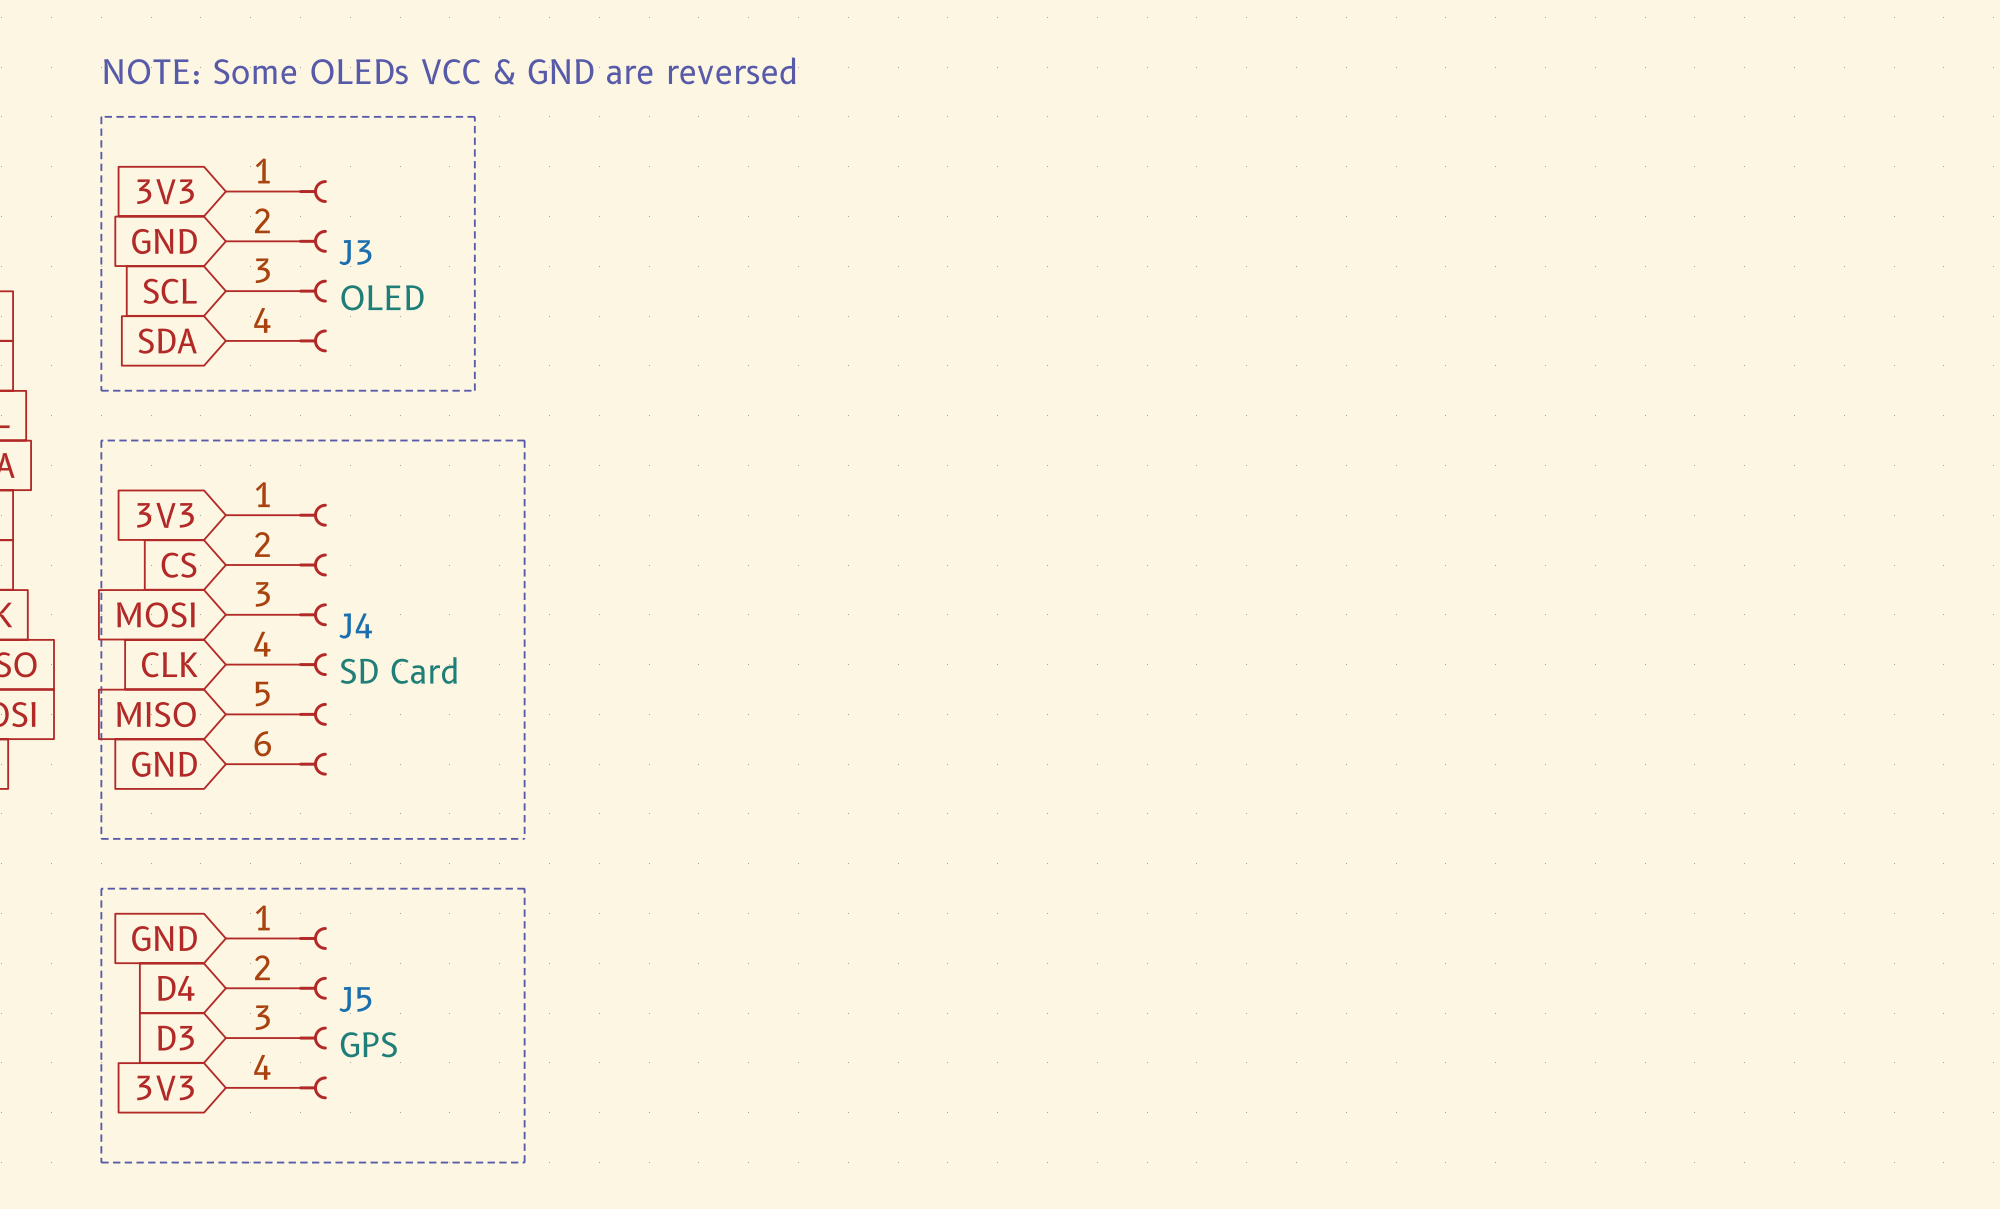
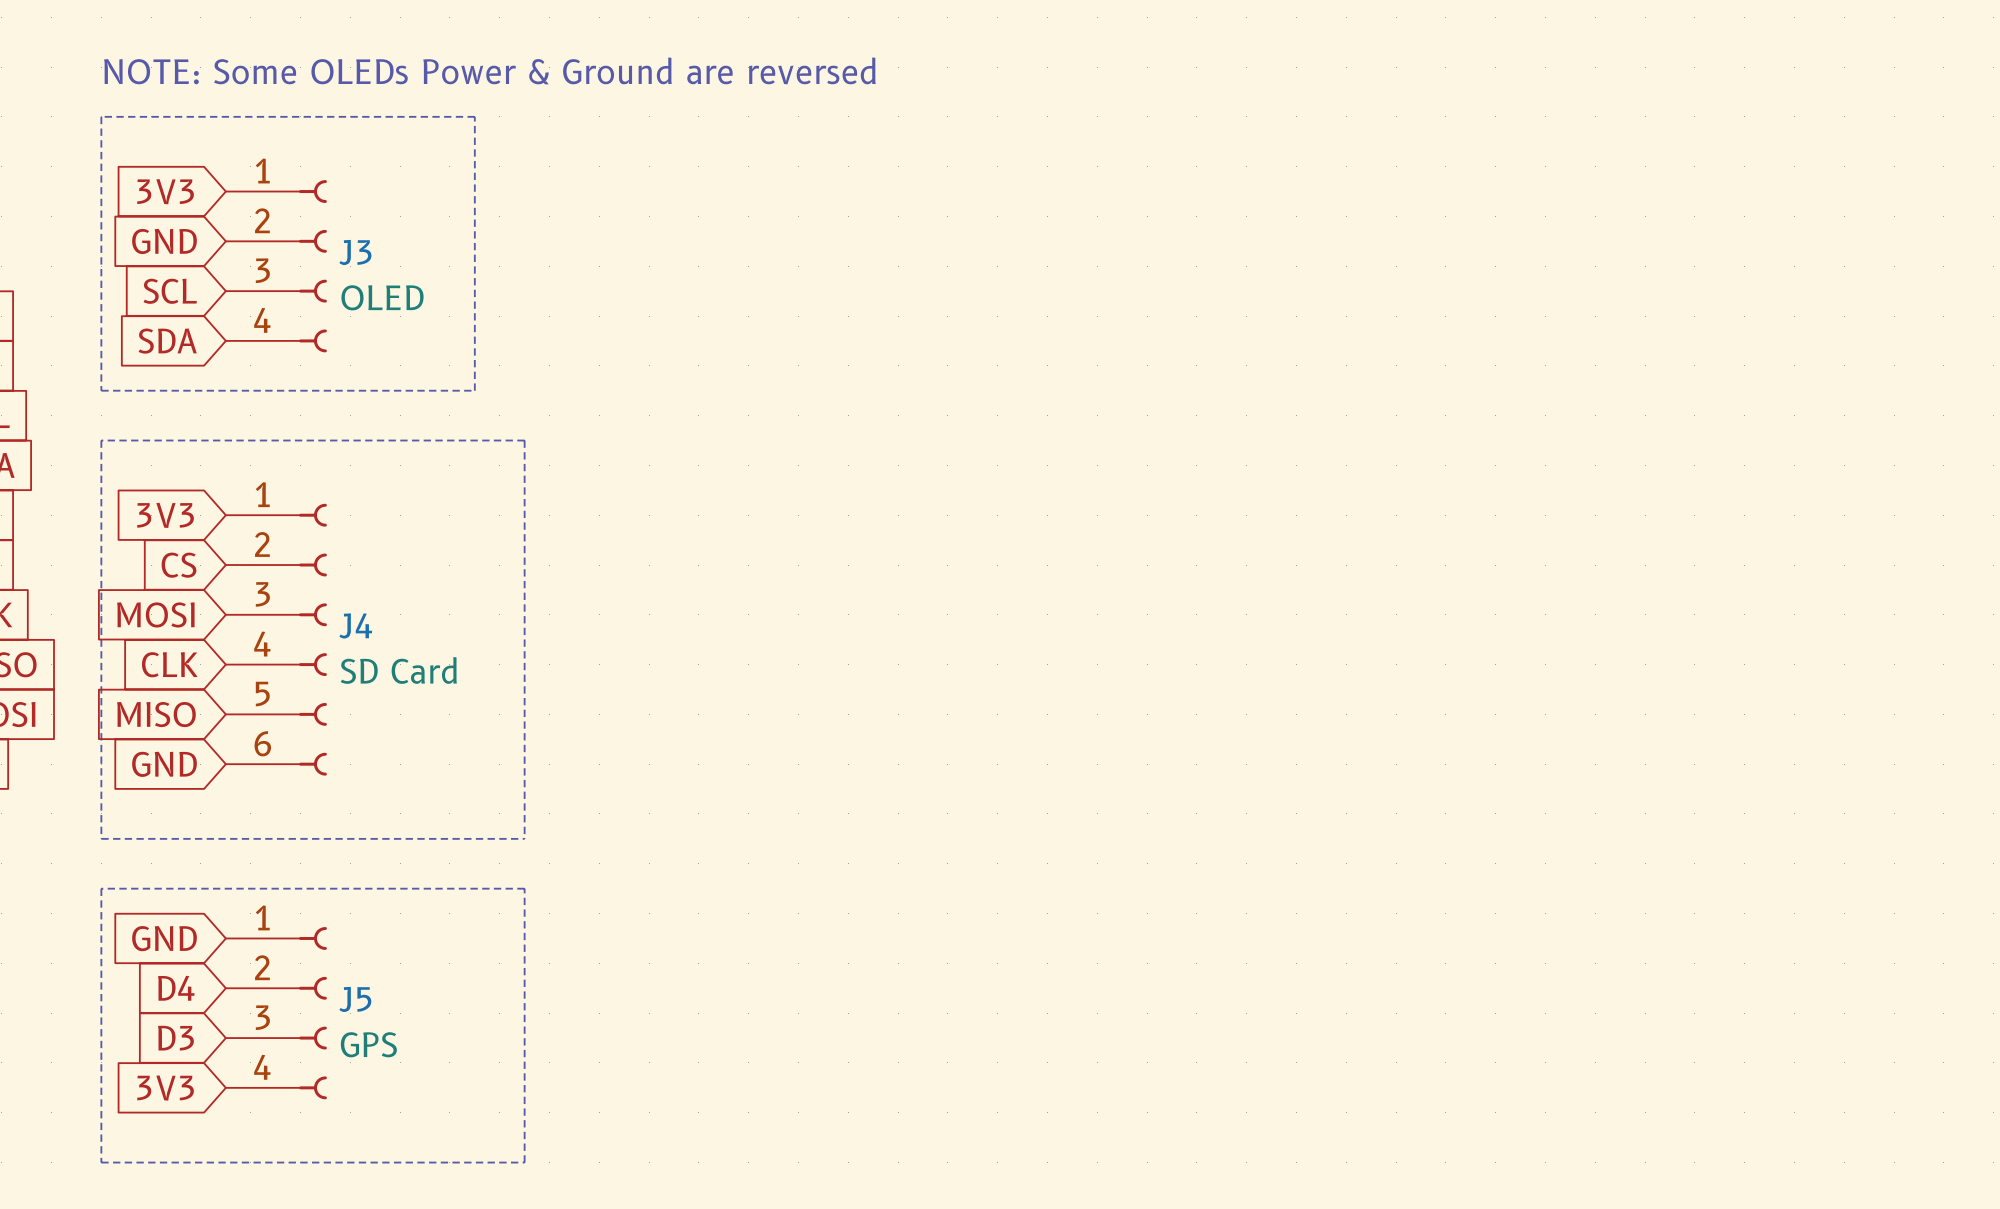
text: NOTE: Some OLEDs VCC & GND are reversed (449, 70) -> NOTE: Some OLEDs Power & Ground are reversed (489, 70)

